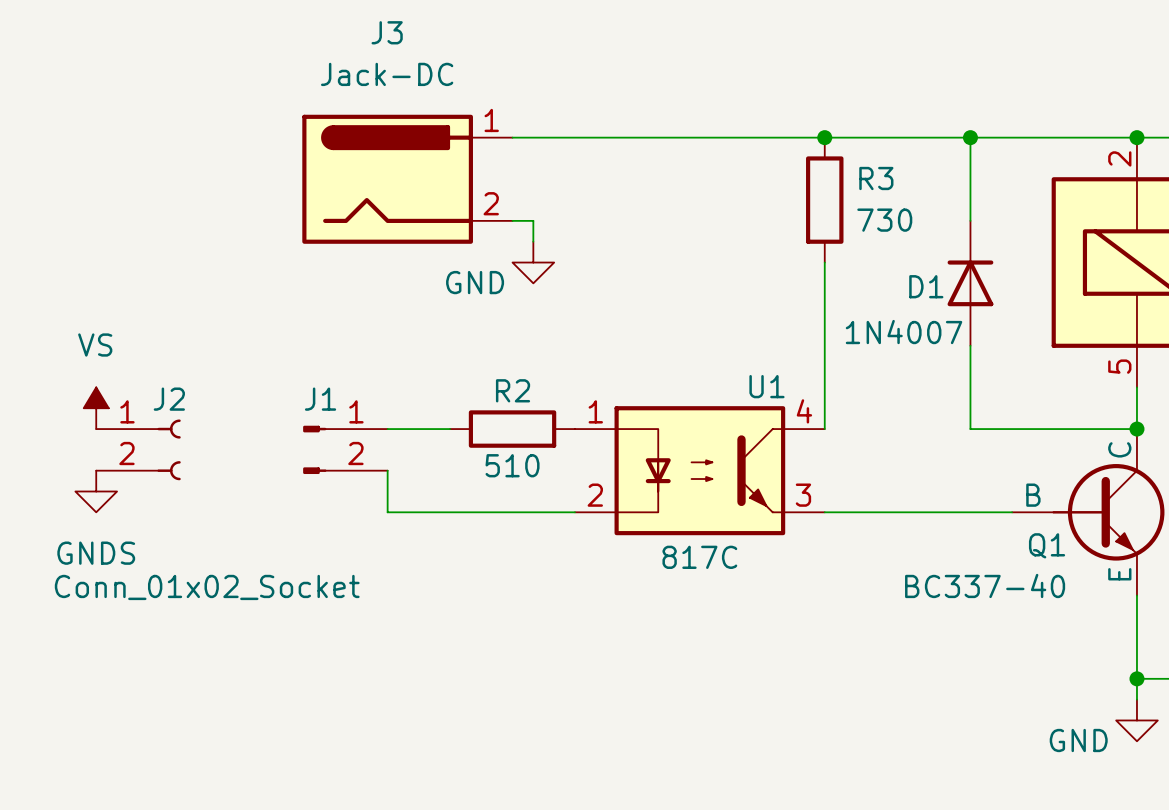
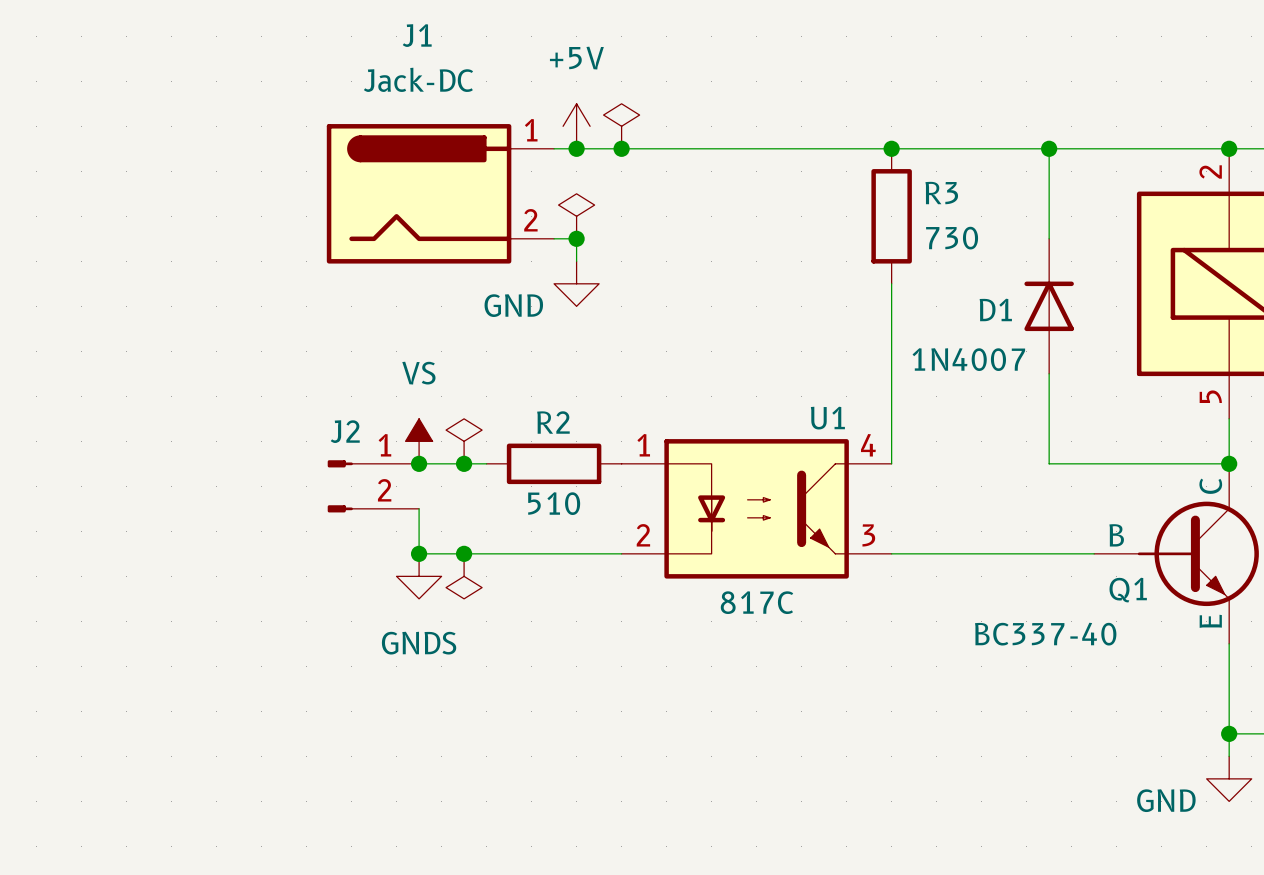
J3 name: J3 (387, 32) -> J1 (417, 35)
power symbol: none -> +5V (576, 126)
power symbol: none -> (621, 126)
junction: none -> (576, 148)
junction: none -> (621, 148)
power symbol: none -> (576, 216)
junction: none -> (576, 238)
J1 name: J1 (320, 399) -> J2 (345, 431)
power symbol position: VS (96, 408) -> VS (419, 441)
power symbol: none -> (464, 441)
junction: none -> (419, 463)
junction: none -> (464, 463)
J2: Conn_01x02_Socket (138, 449) -> none
power symbol position: GNDS (96, 491) -> GNDS (419, 576)
junction: none -> (419, 553)
junction: none -> (464, 553)
power symbol: none -> (464, 576)

